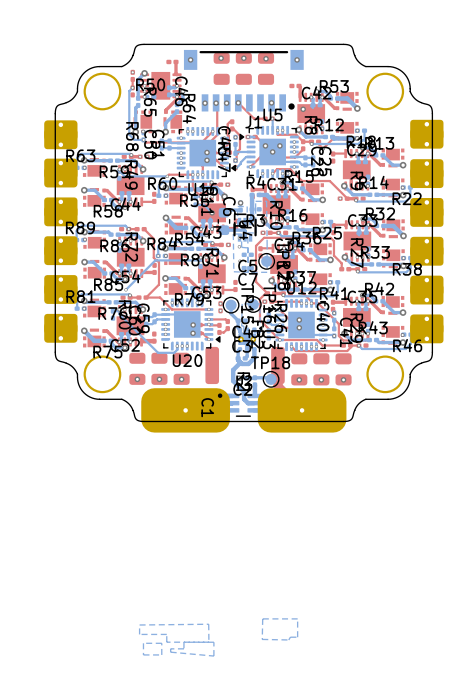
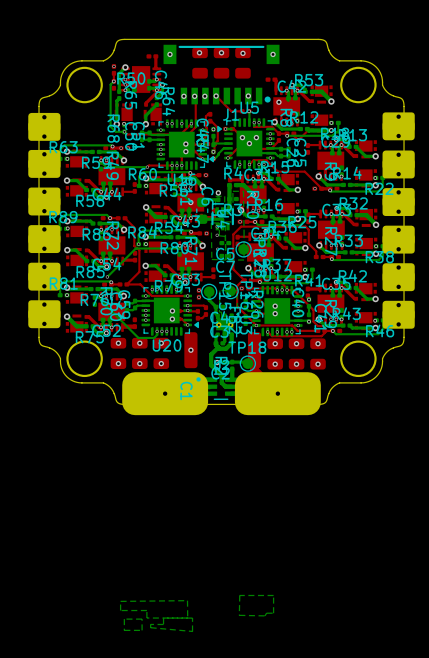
via: none -> (118, 343)
via: none -> (139, 343)
via: none -> (161, 343)
via: none -> (275, 343)
via: none -> (296, 343)
via: none -> (318, 343)
via: none -> (190, 350)

